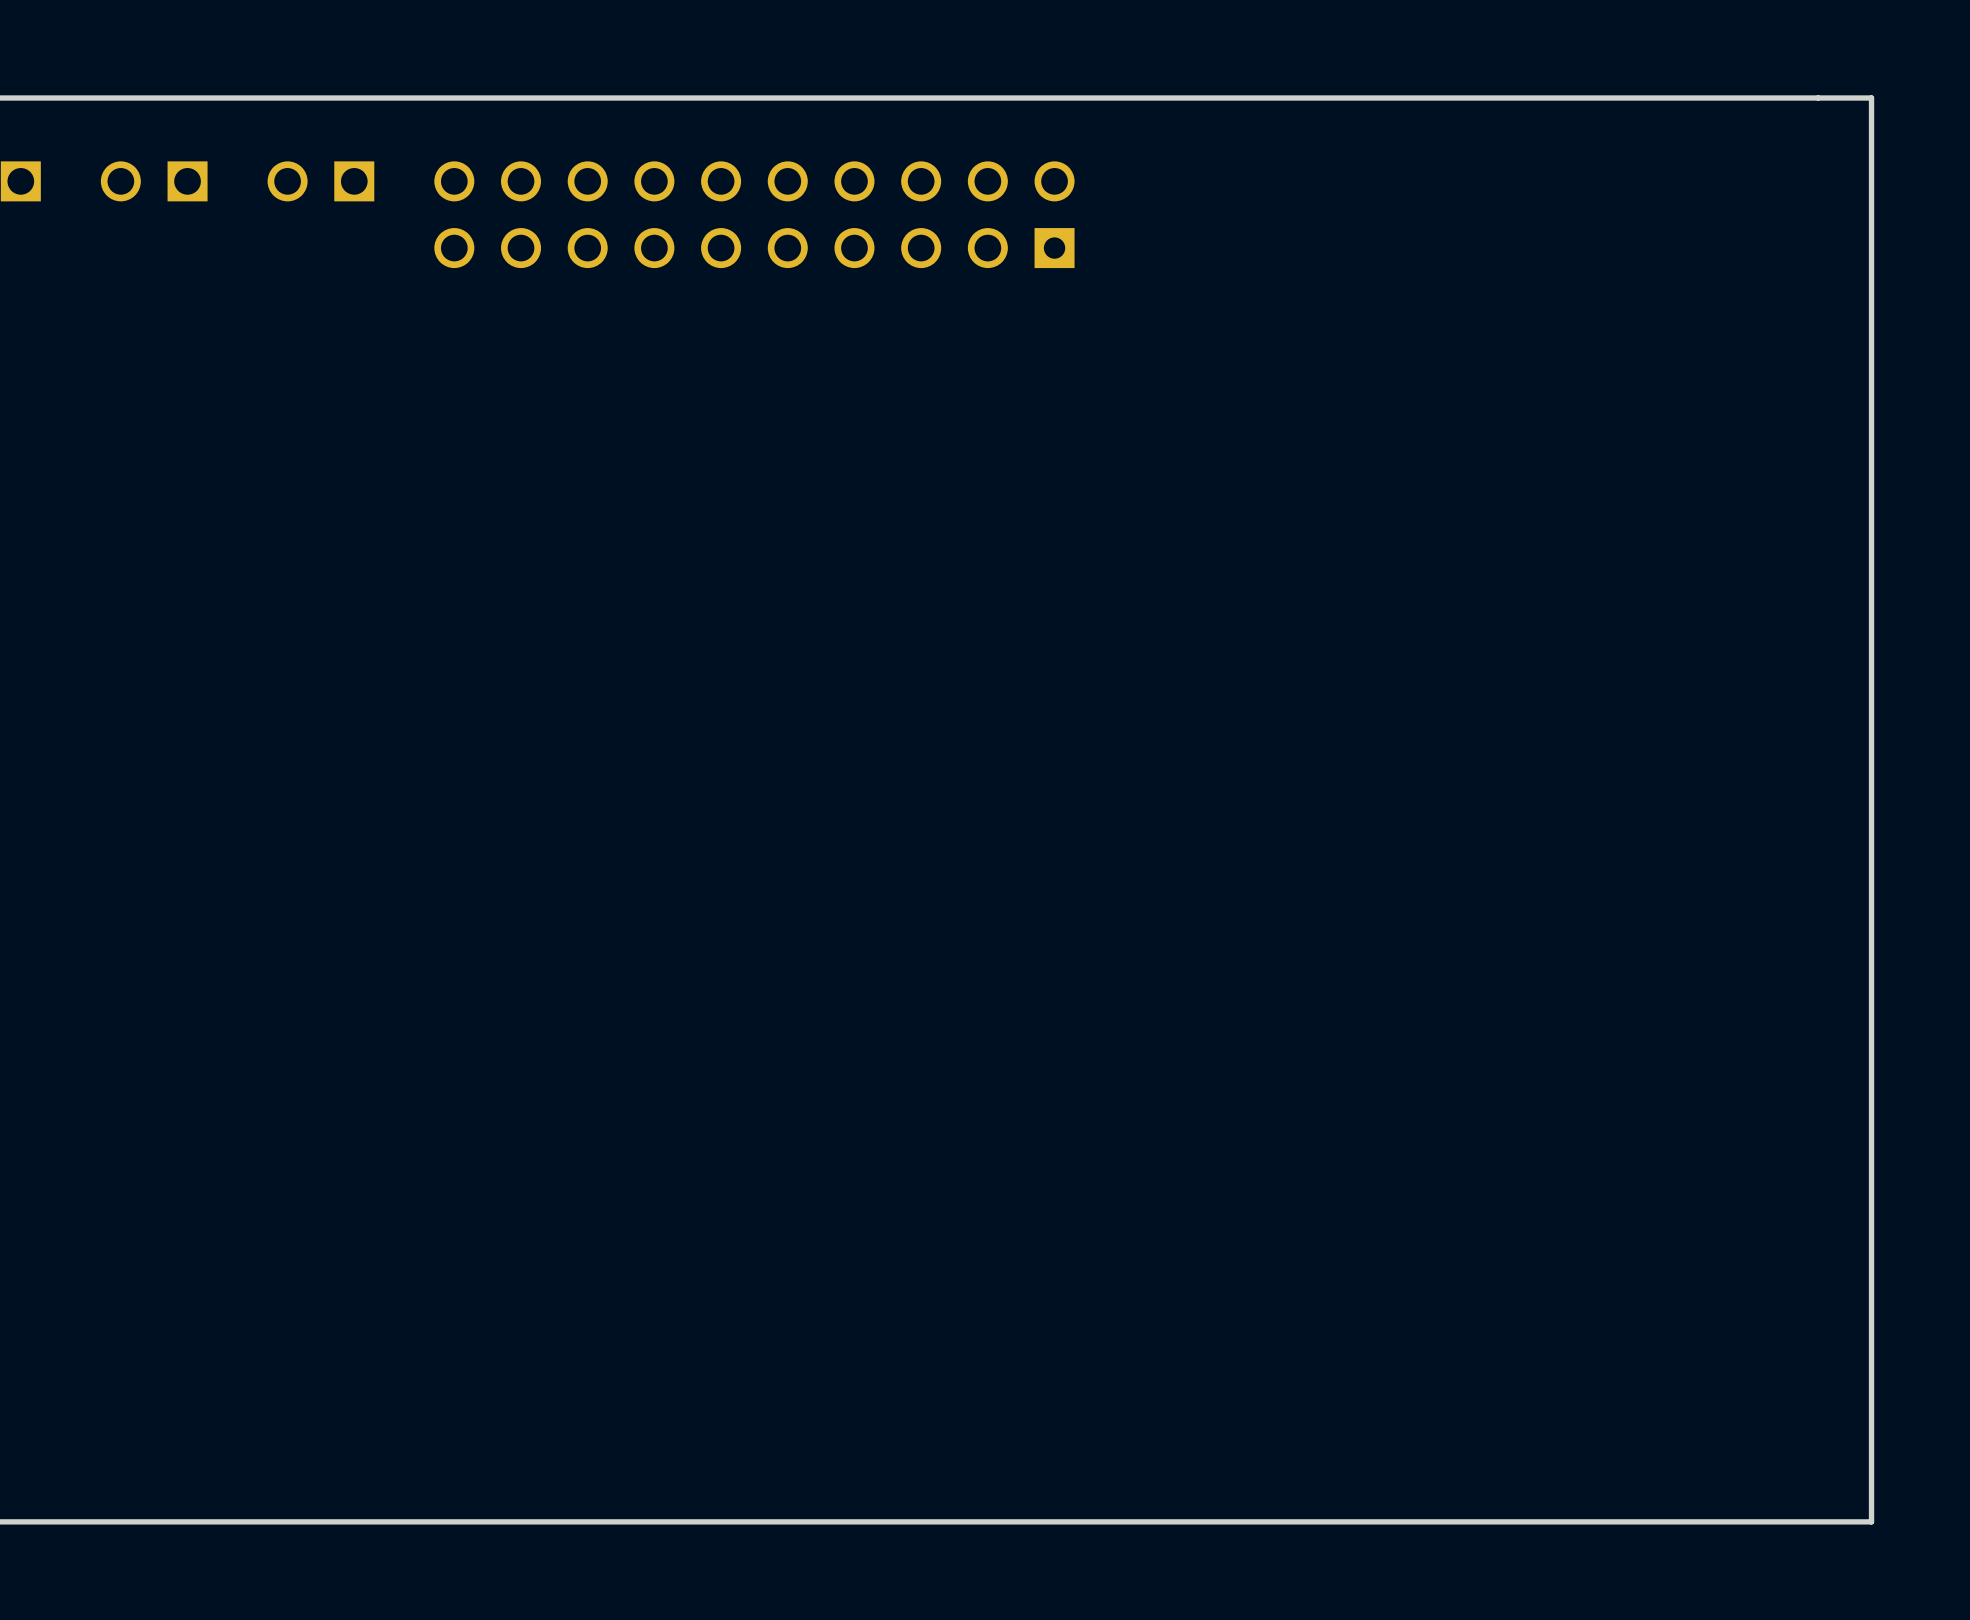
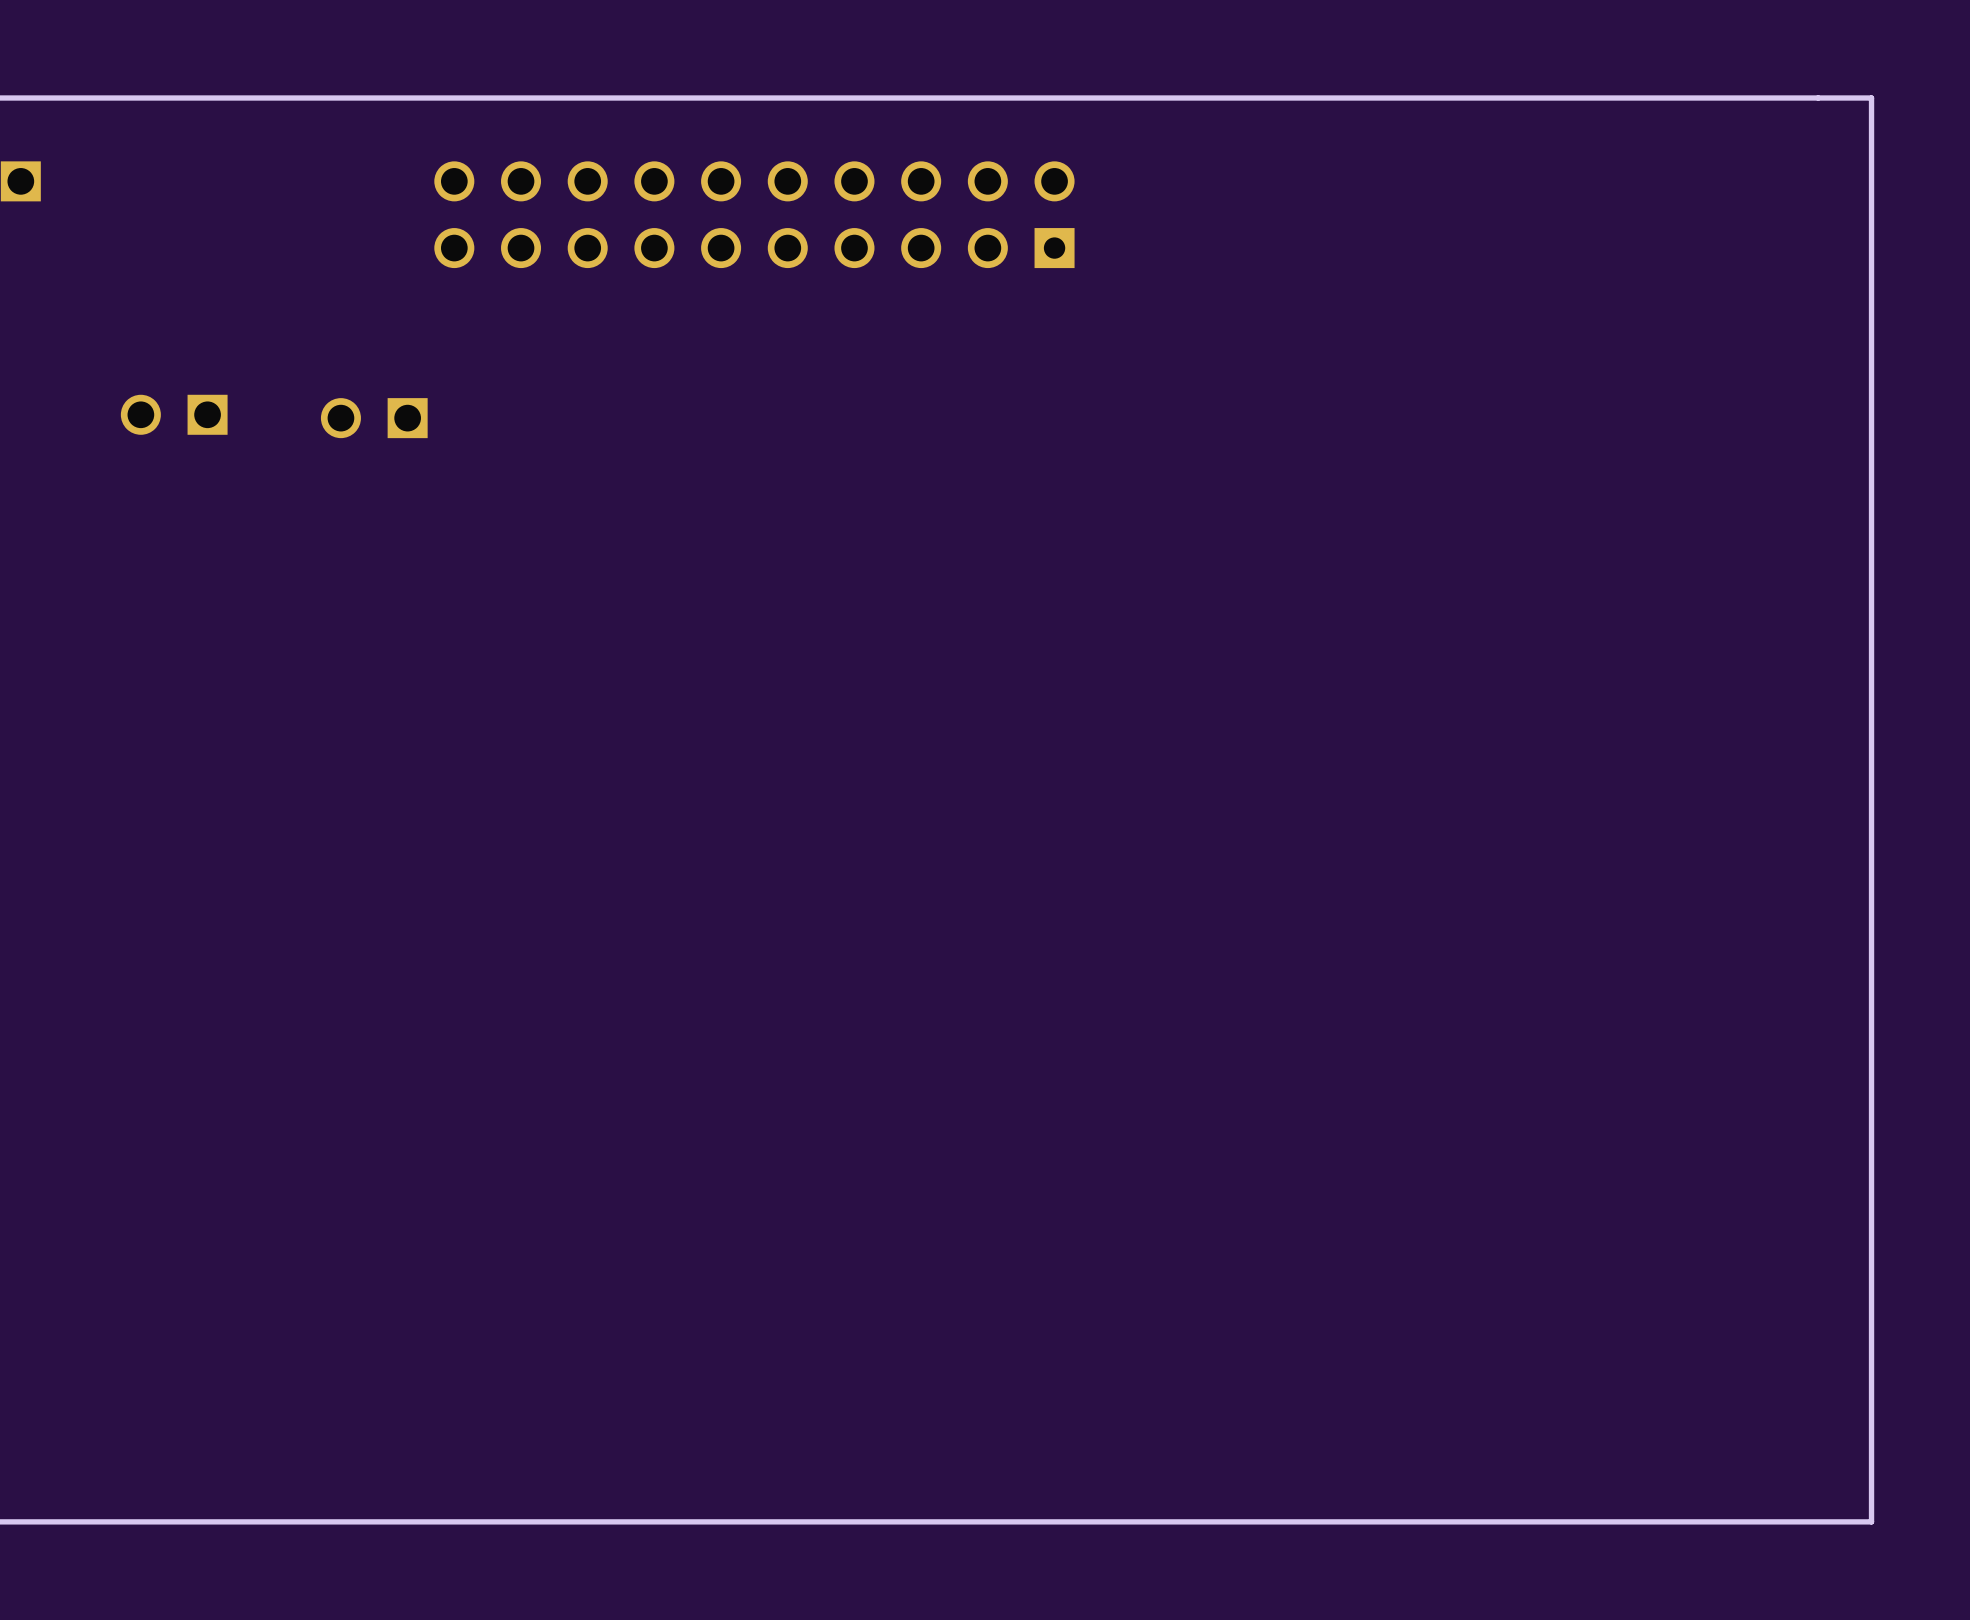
part: (154, 181) -> none
part: (320, 181) -> none
part: none -> (174, 414)
part: none -> (374, 418)

